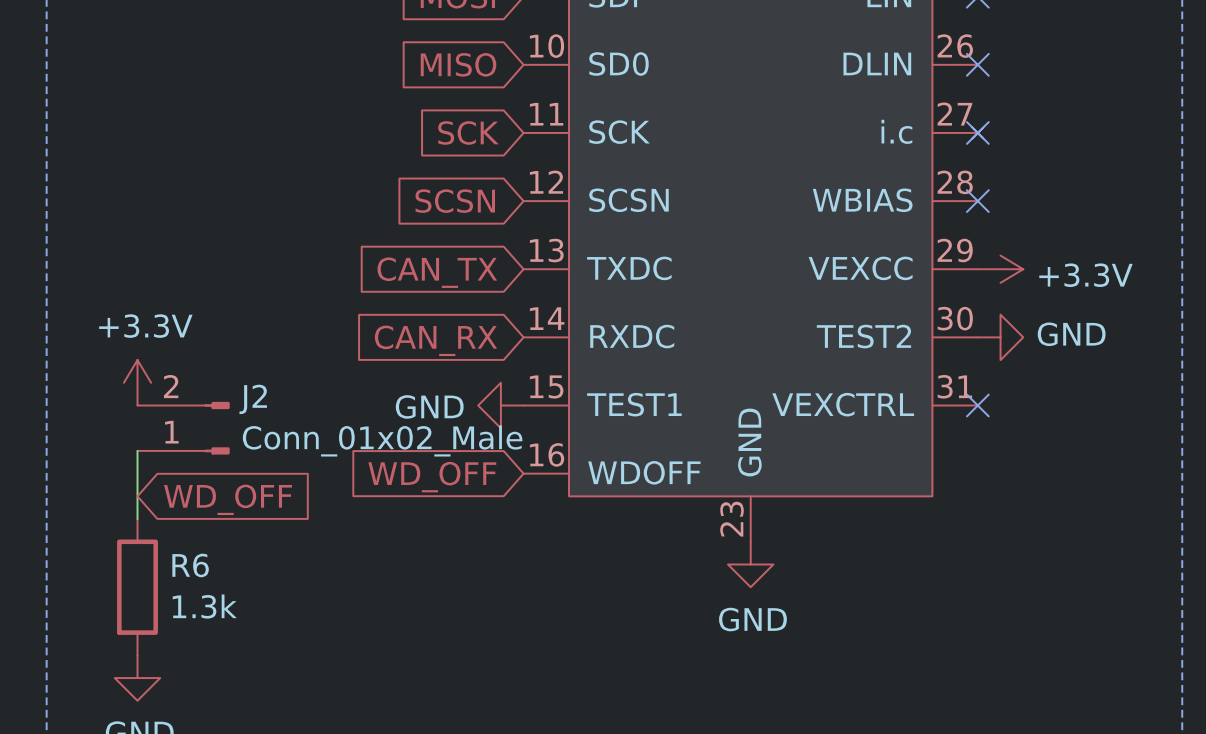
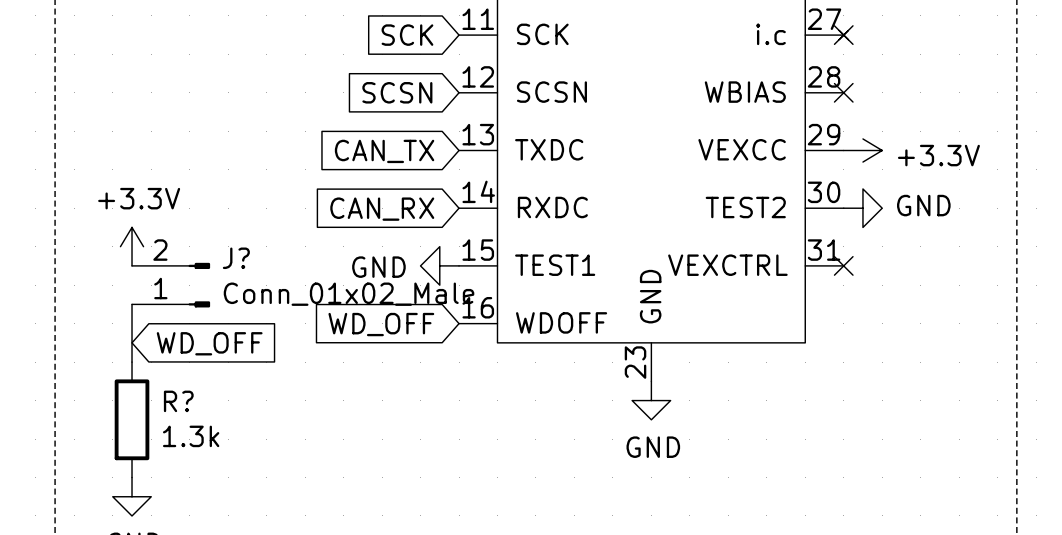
J2 name: J2 (253, 399) -> J? (236, 258)
R6 name: R6 (190, 565) -> R? (178, 401)

